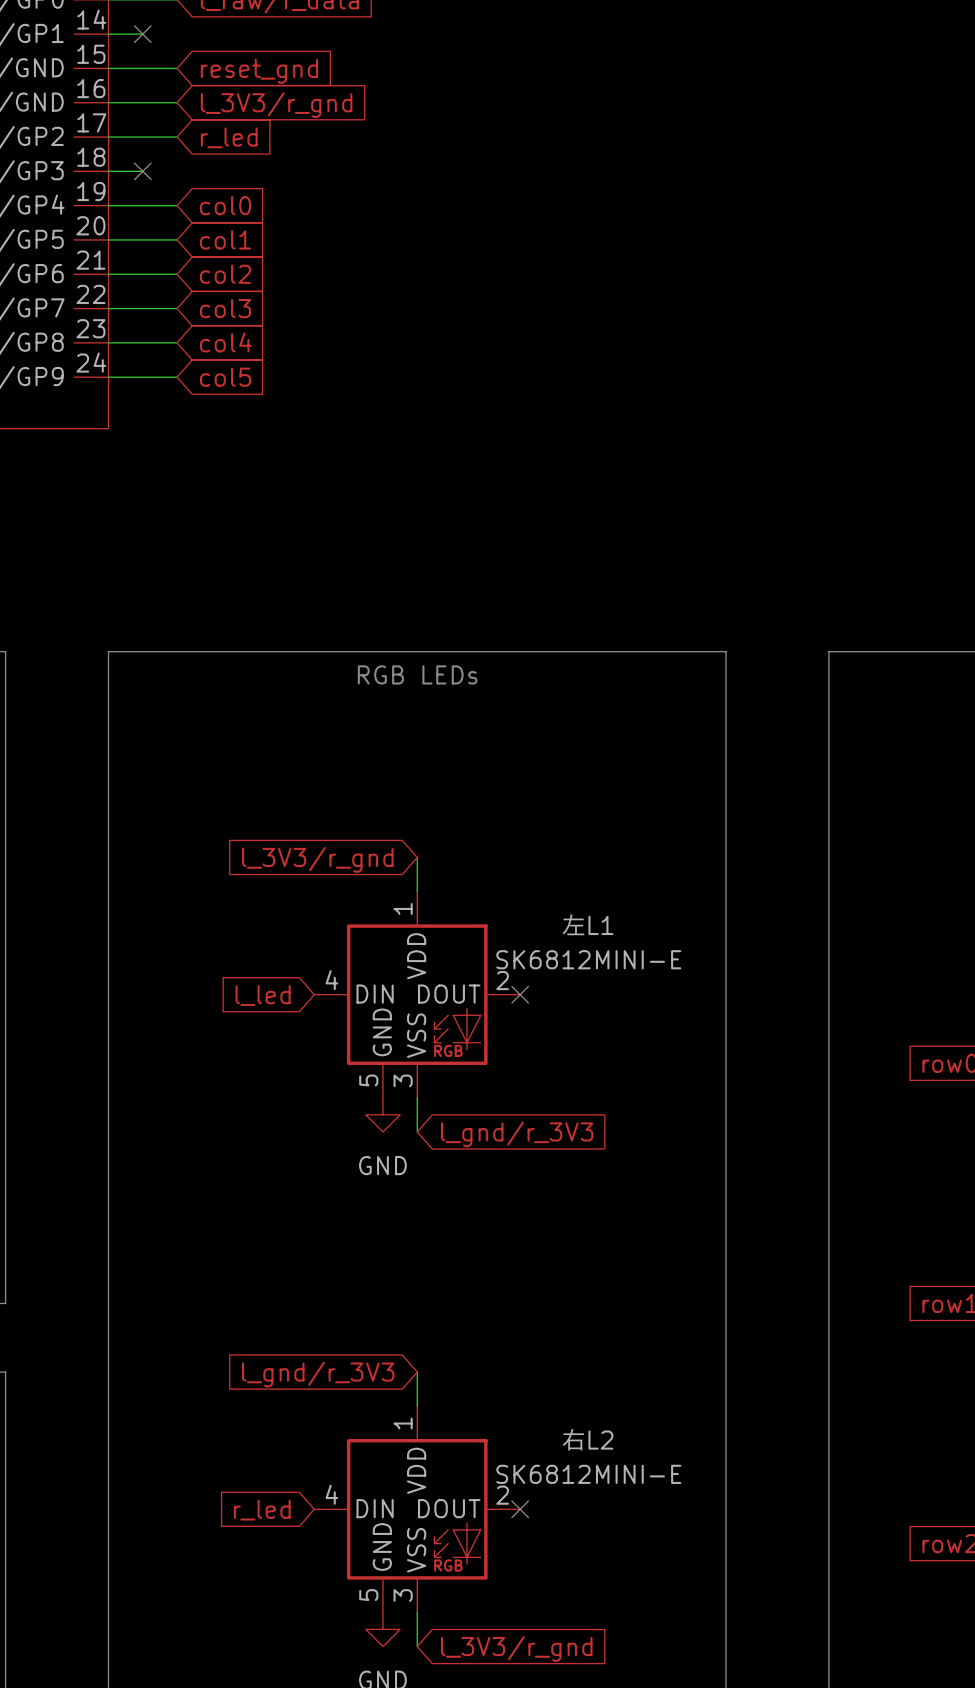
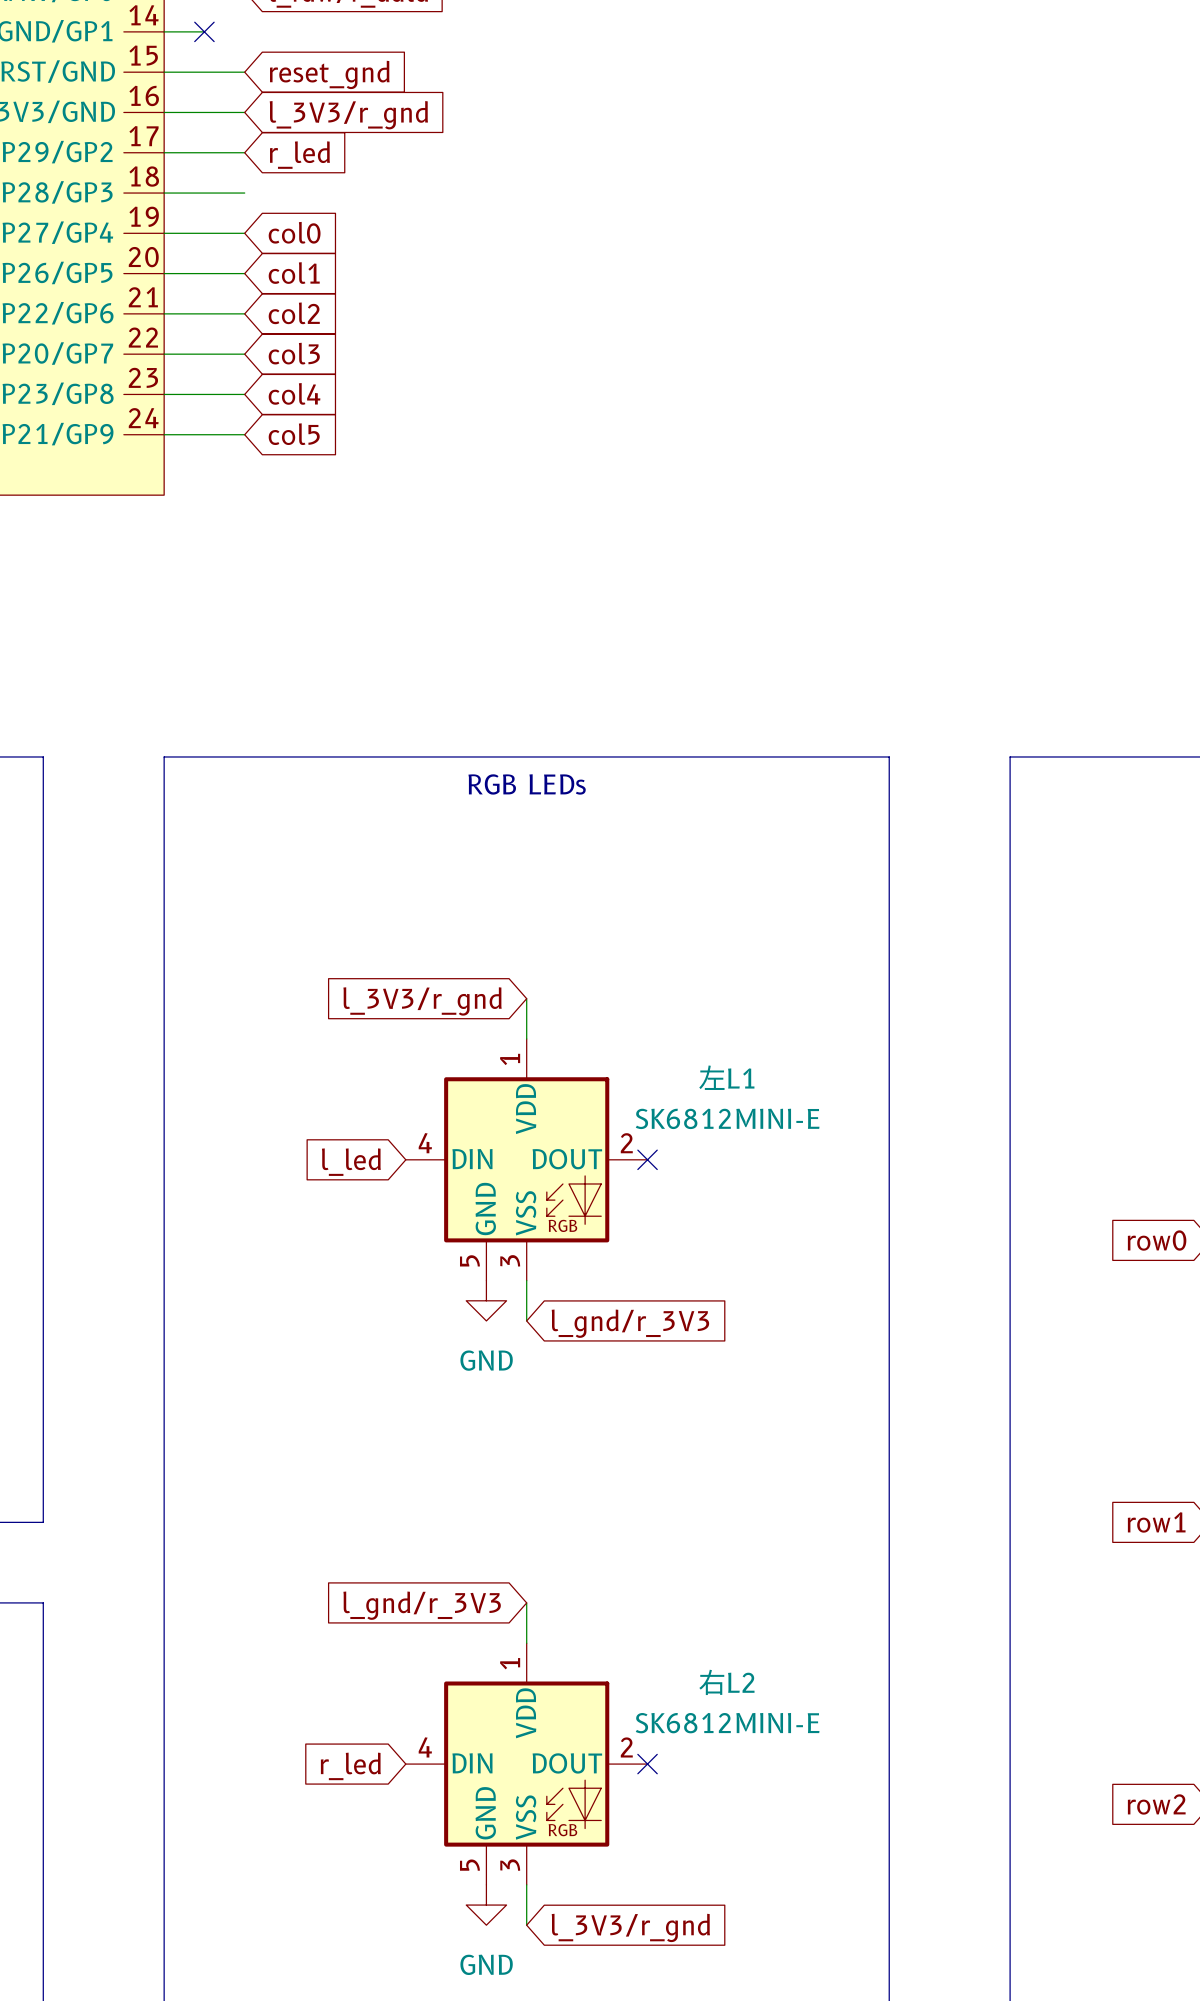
wire: none -> (204, 193) (244, 193)
no-connect mark: (142, 171) -> none

